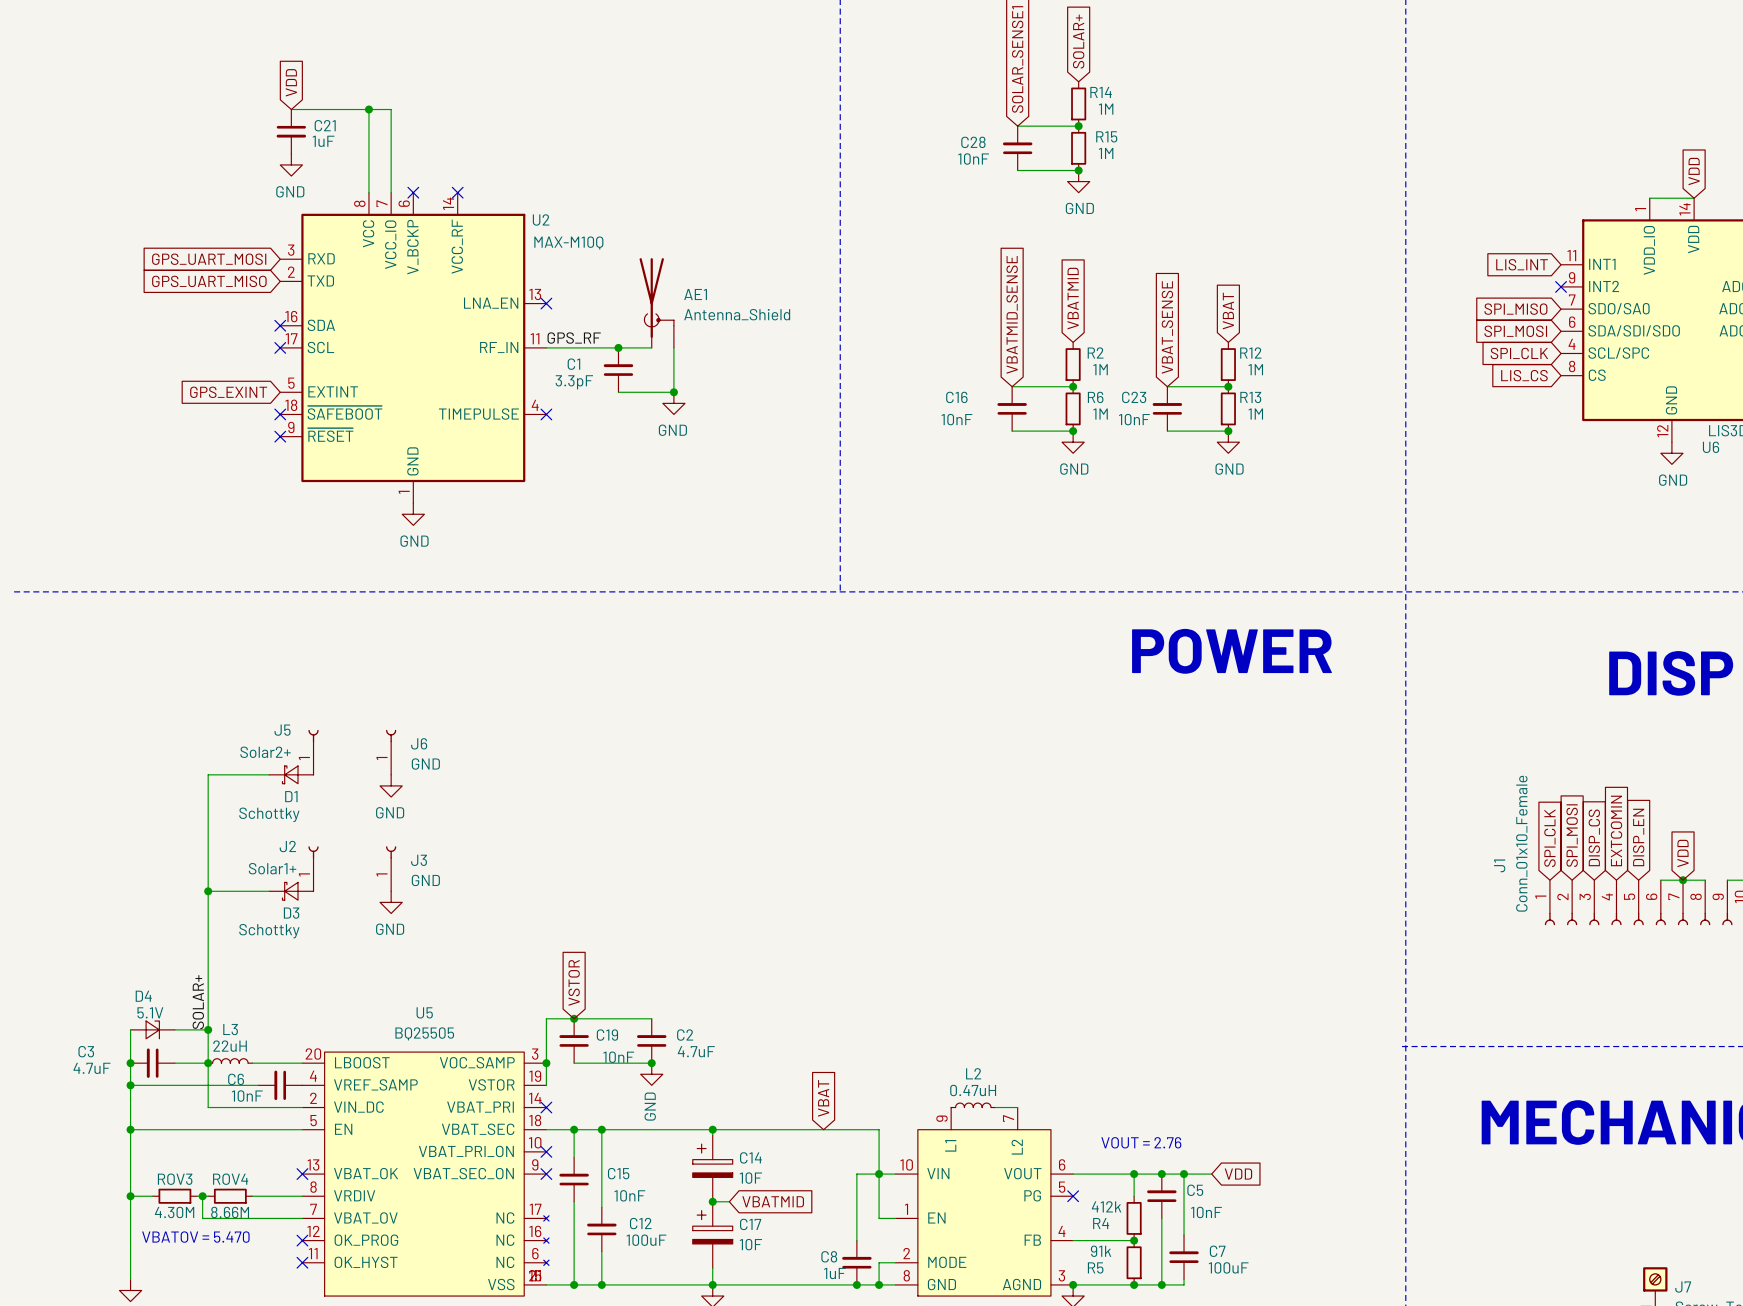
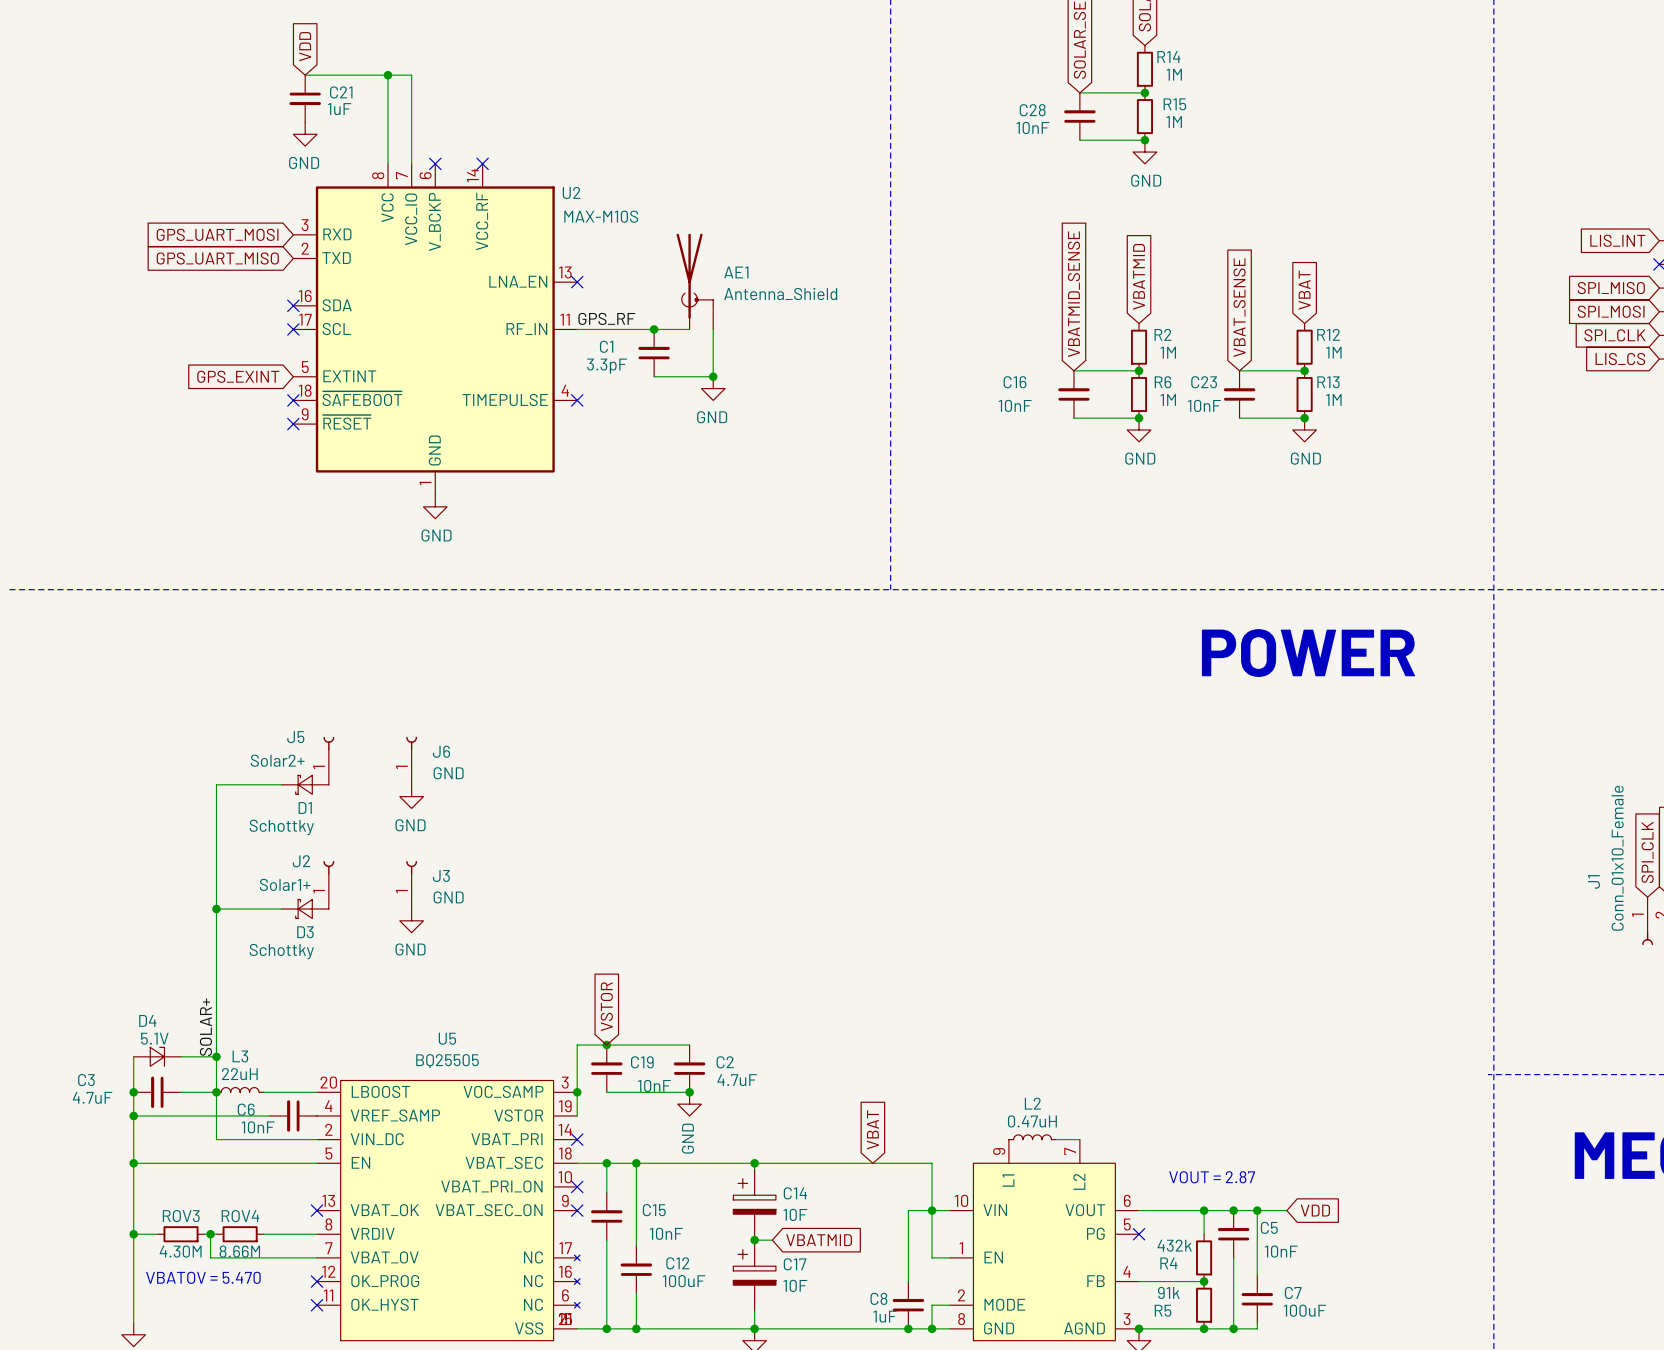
U2 value: MAX-M10Q (568, 243) -> MAX-M10S (601, 216)
text: VOUT = 2.76 (1141, 1142) -> VOUT = 2.87 (1212, 1177)
R4 value: 412k (1106, 1206) -> 432k (1174, 1245)

